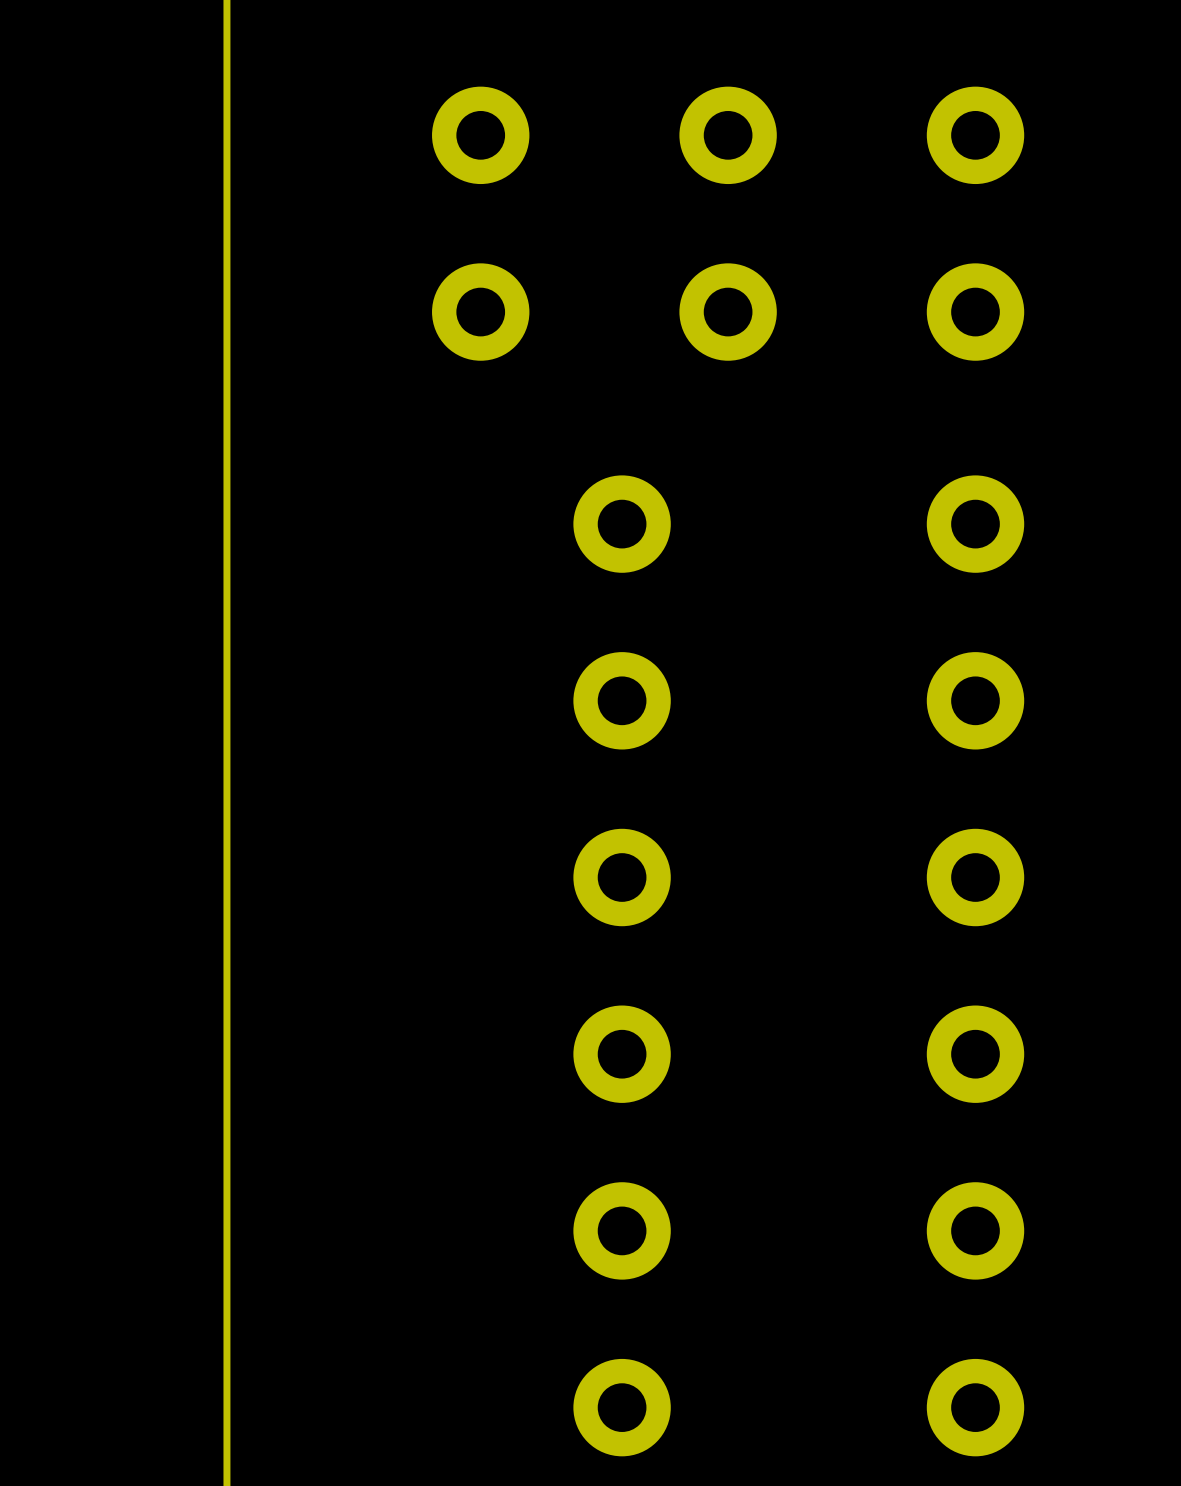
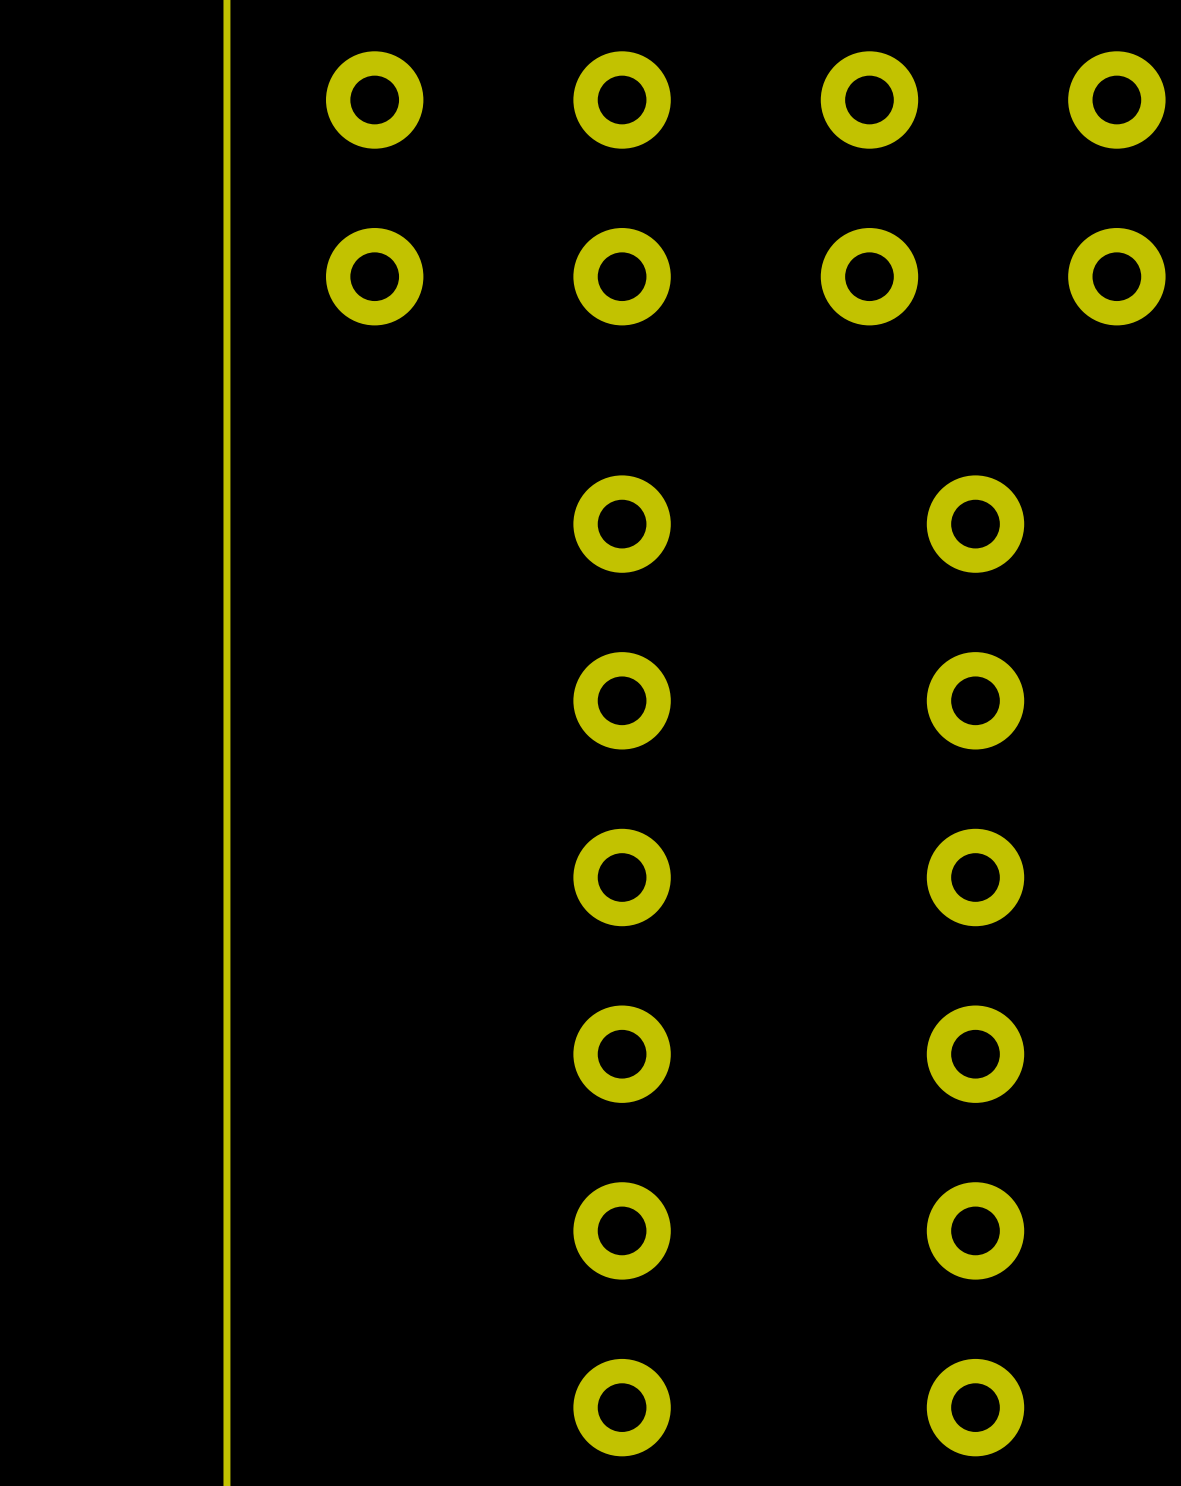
part: none -> (374, 188)
part: none -> (622, 188)
part: none -> (869, 188)
part: none -> (1116, 188)
part: (480, 223) -> none
part: (728, 223) -> none
part: (975, 223) -> none

